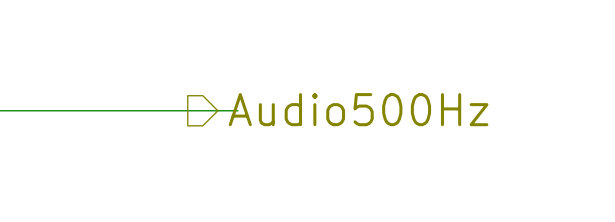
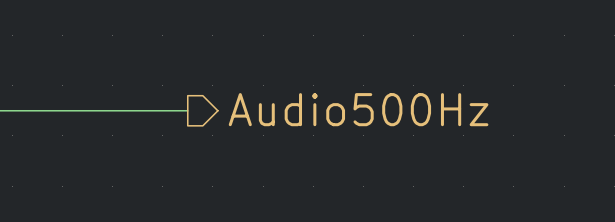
wire: (187, 110) (237, 110) -> none

